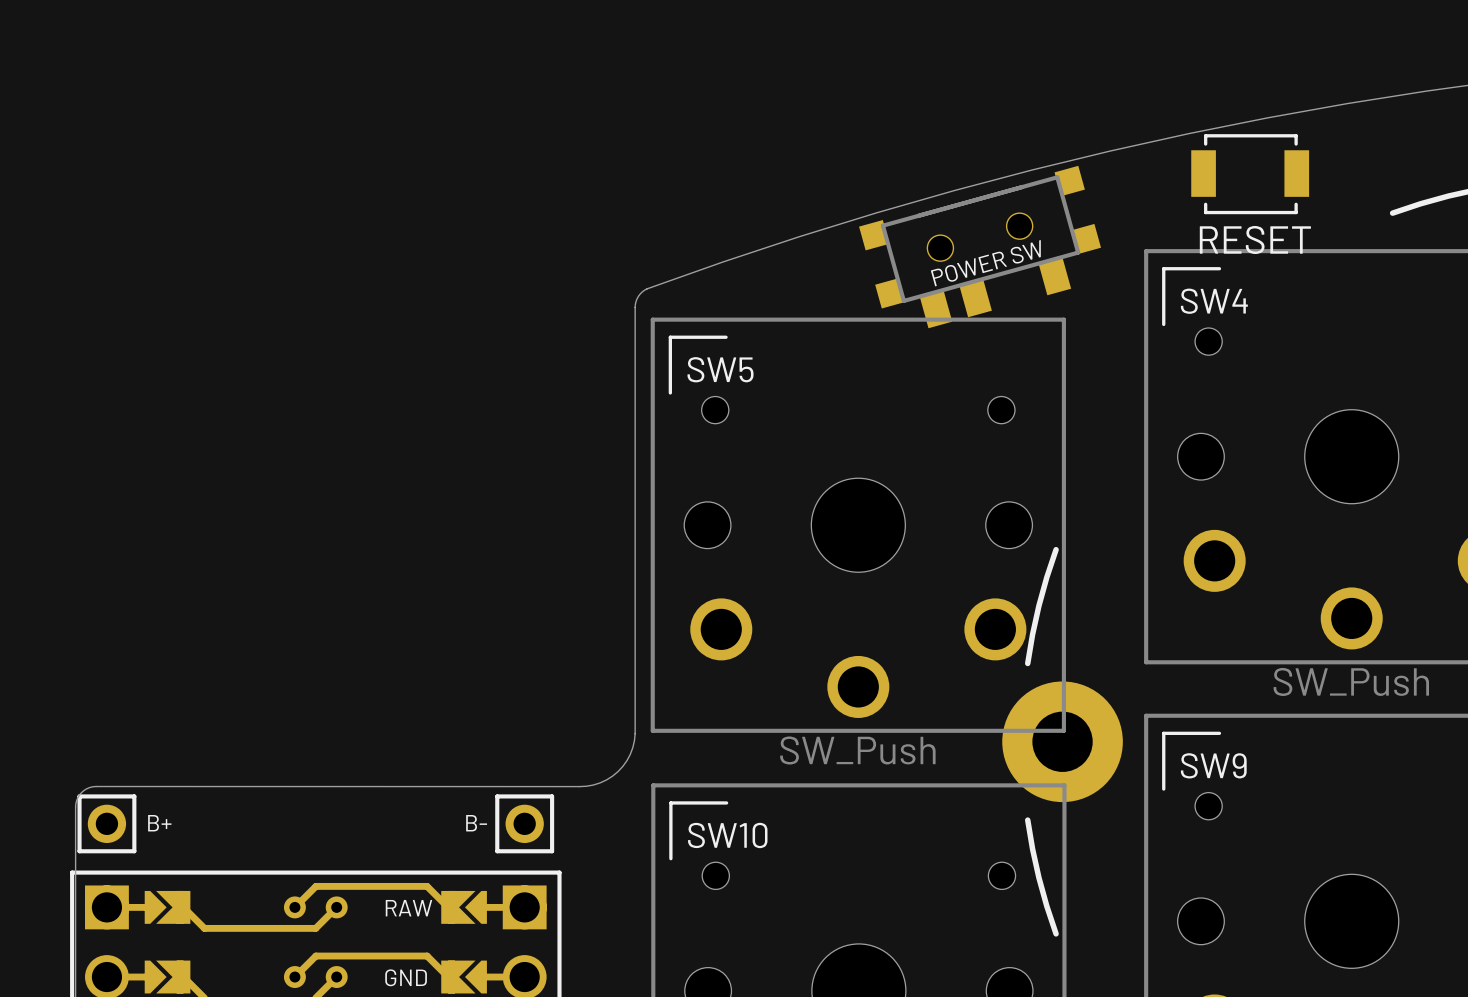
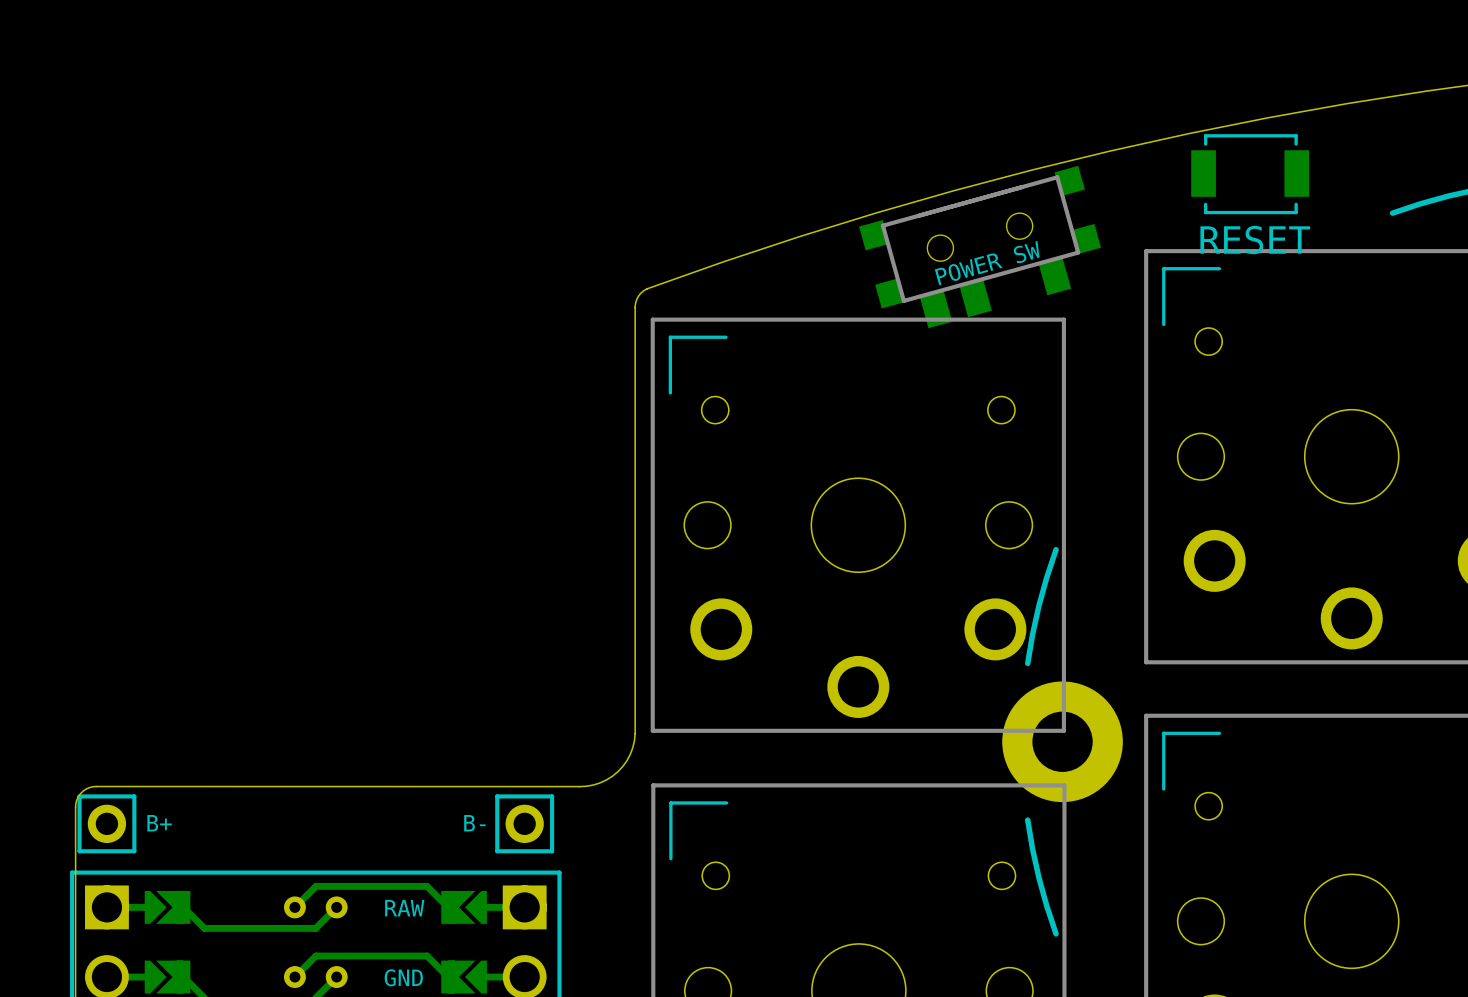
SW4 name: SW4 (1214, 301) -> none
SW5 name: SW5 (720, 369) -> none
SW4 value: SW_Push (1351, 681) -> none
SW5 value: SW_Push (857, 750) -> none
SW9 name: SW9 (1213, 765) -> none
SW10 name: SW10 (727, 835) -> none

